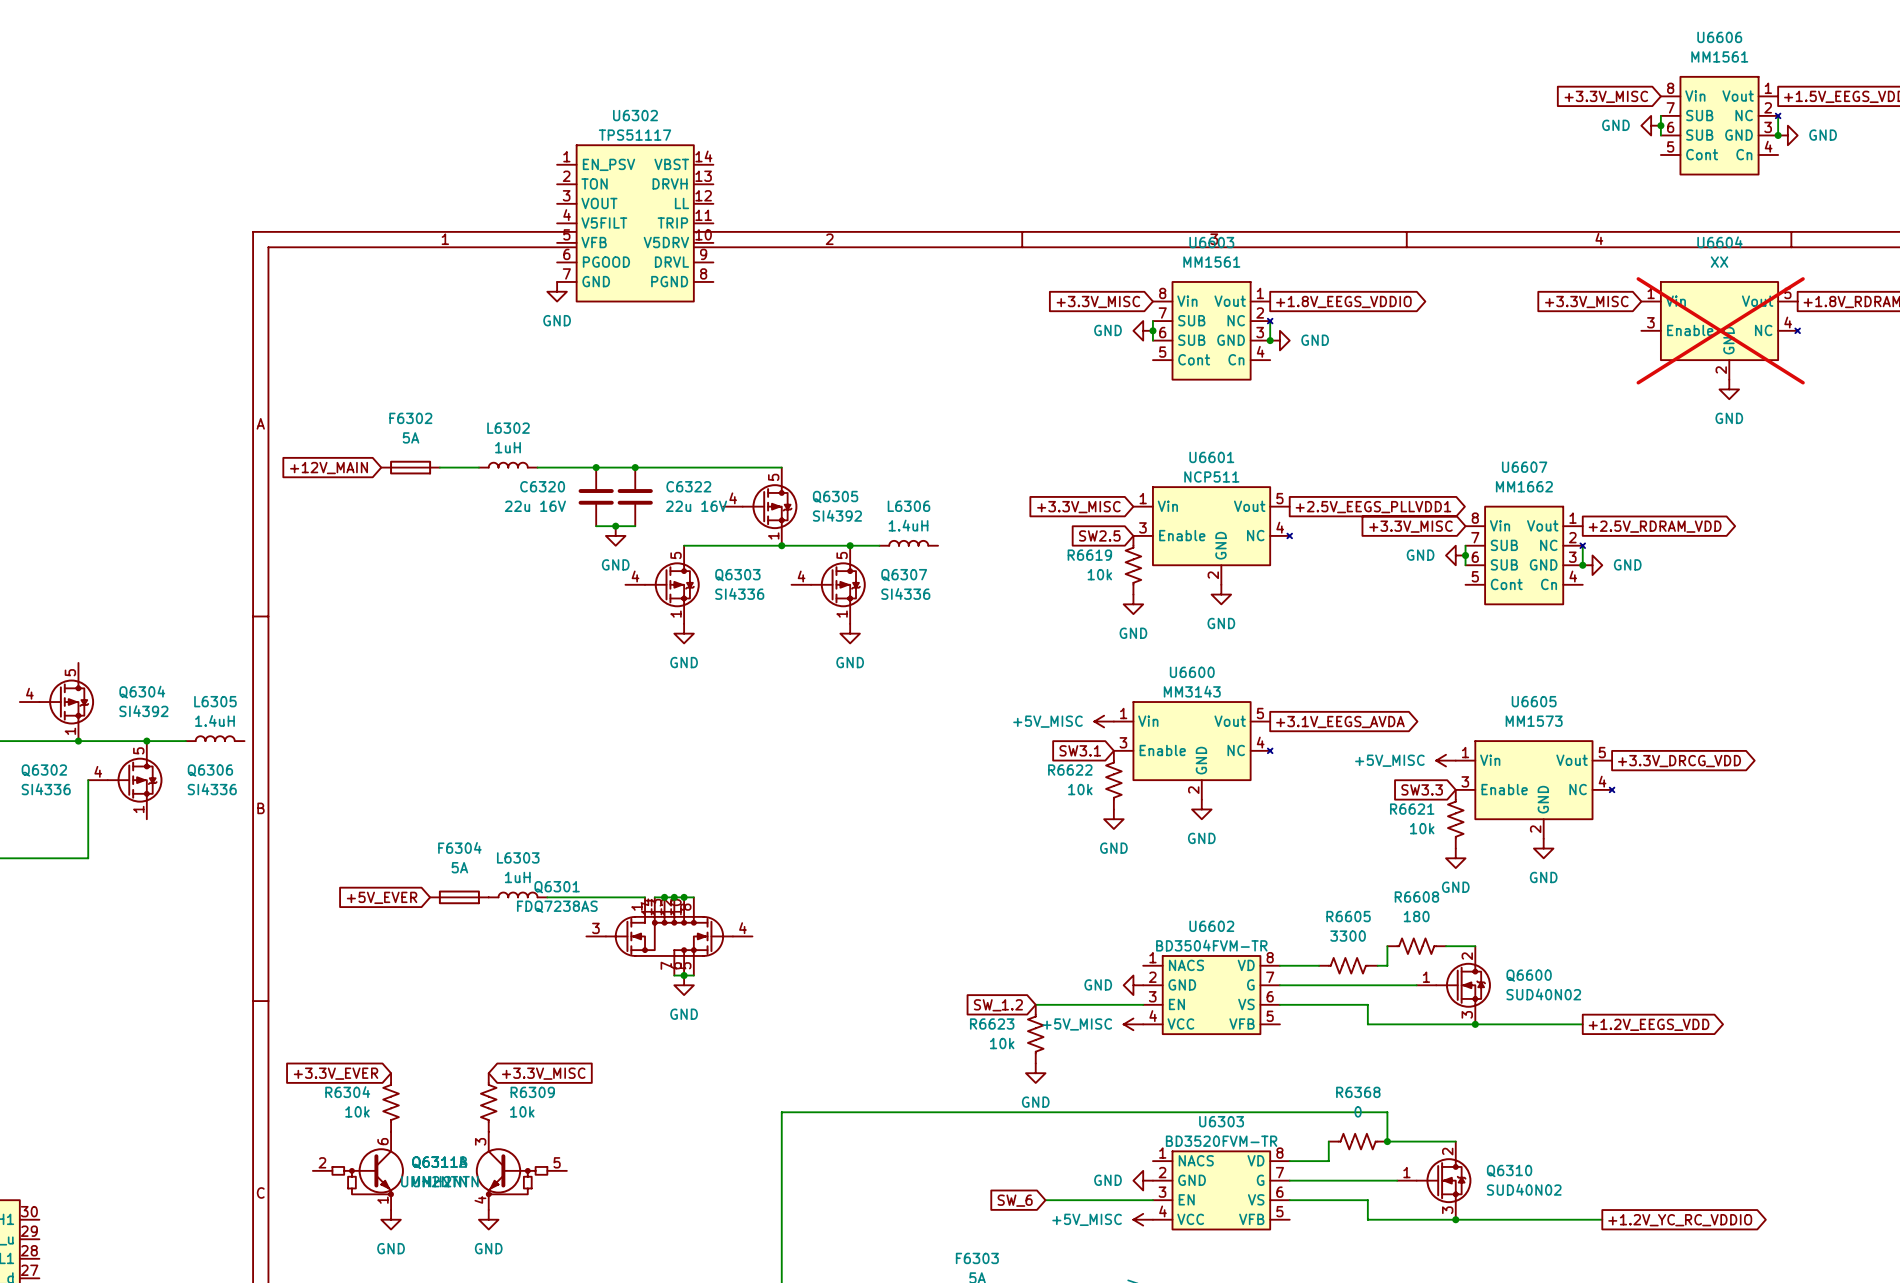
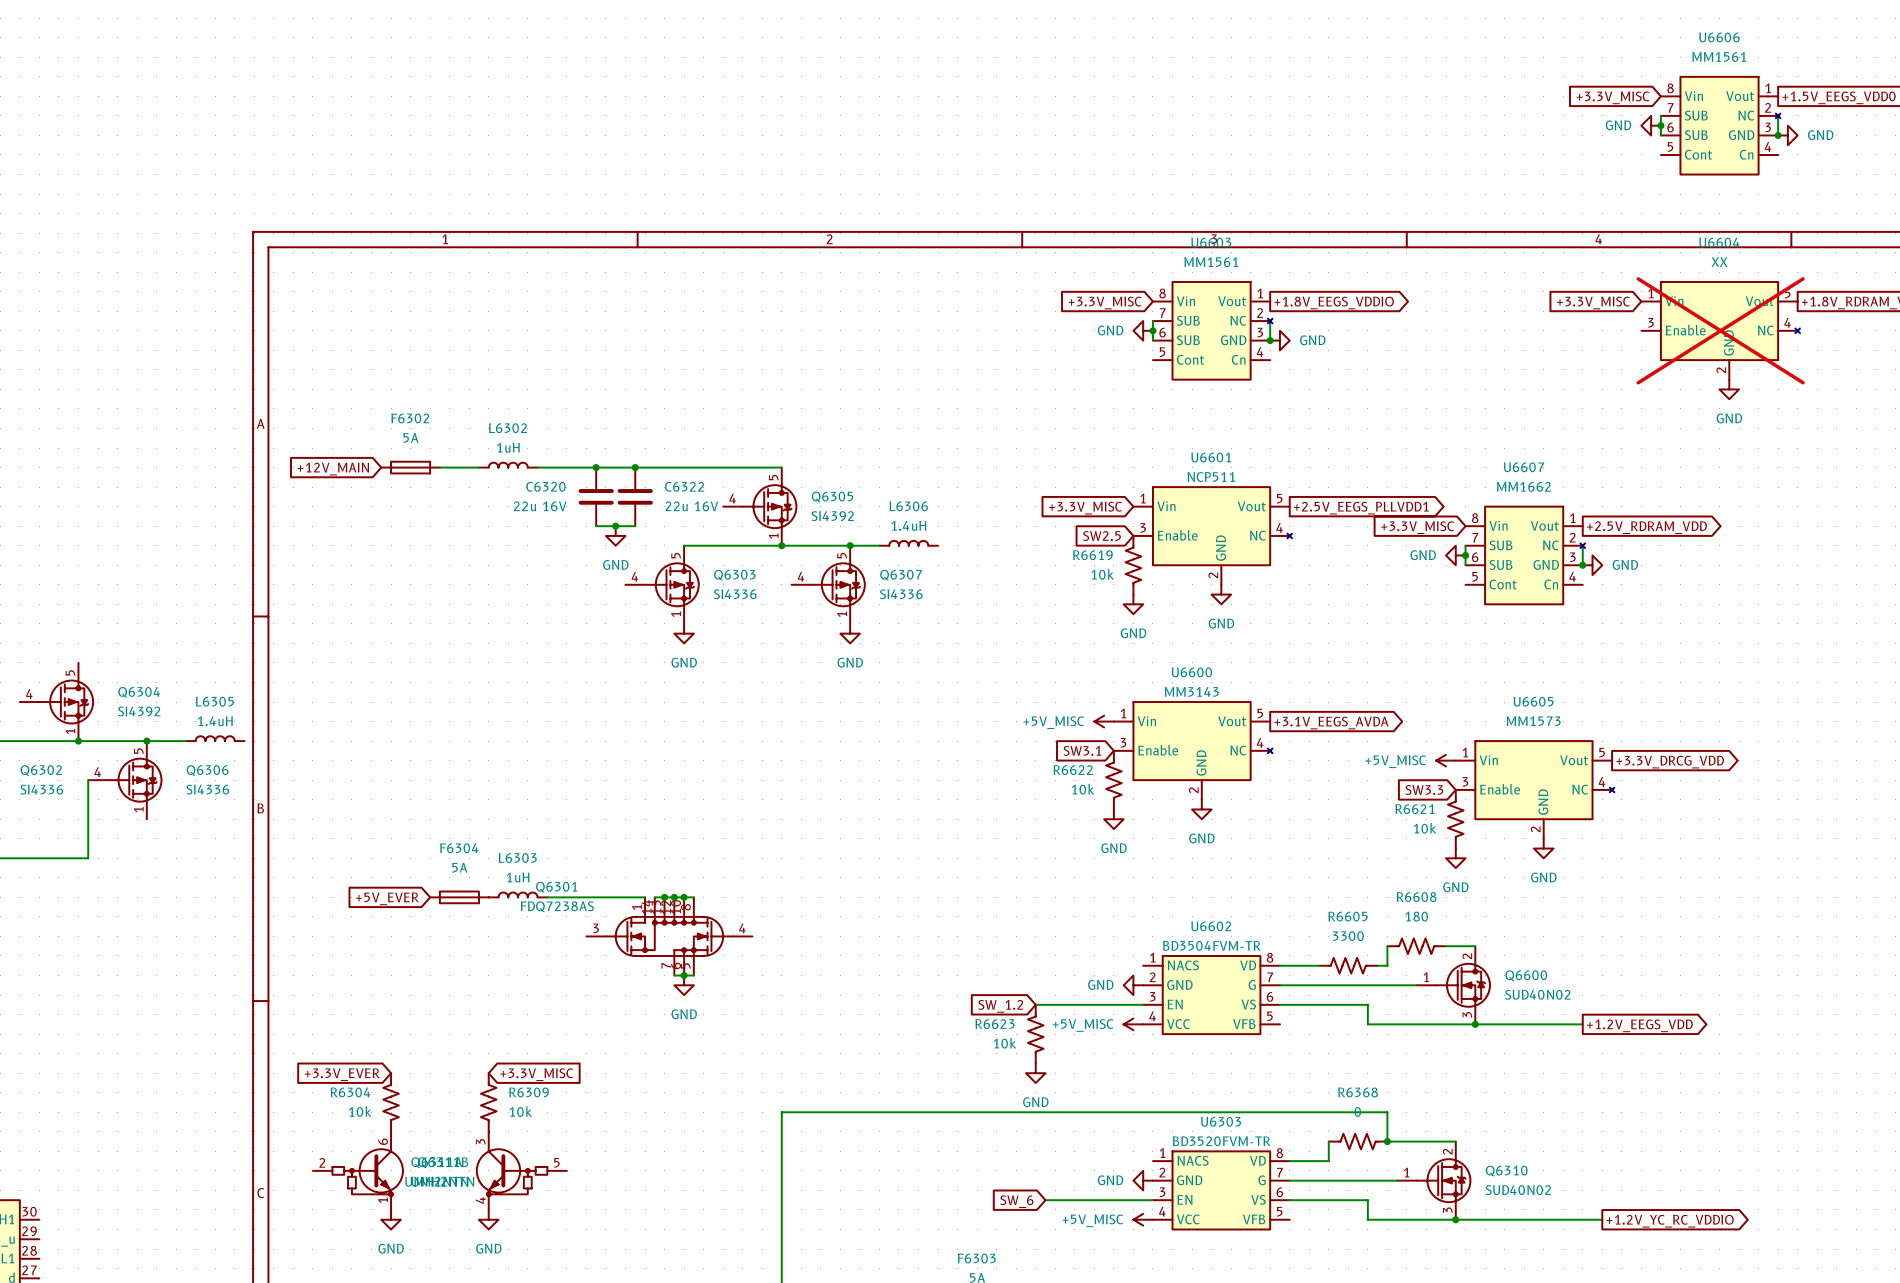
U6302: TPS51117 (635, 223) -> none
power symbol: GND (557, 291) -> none

